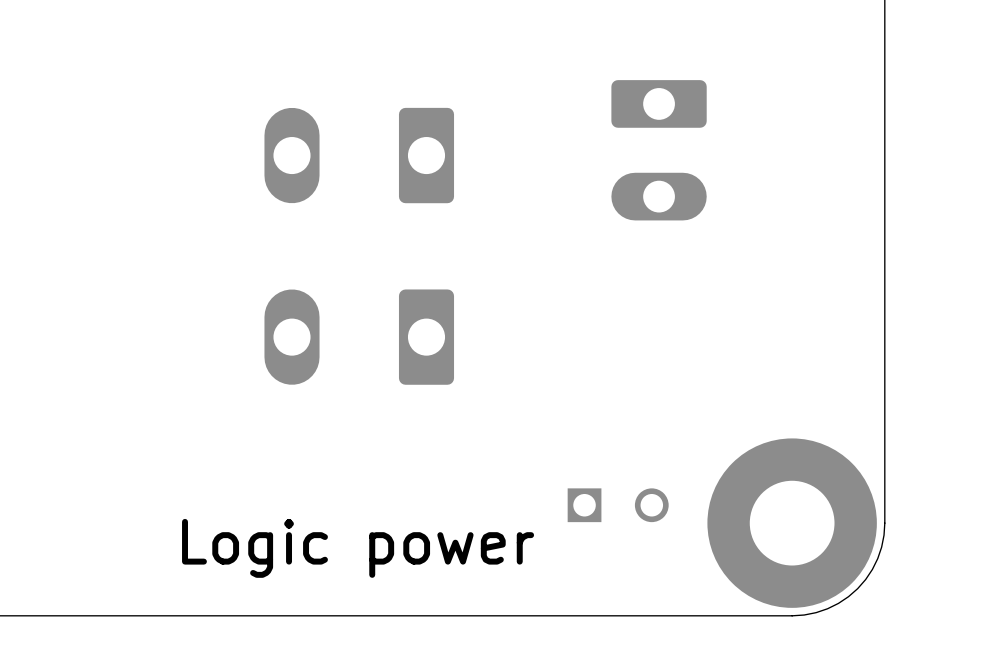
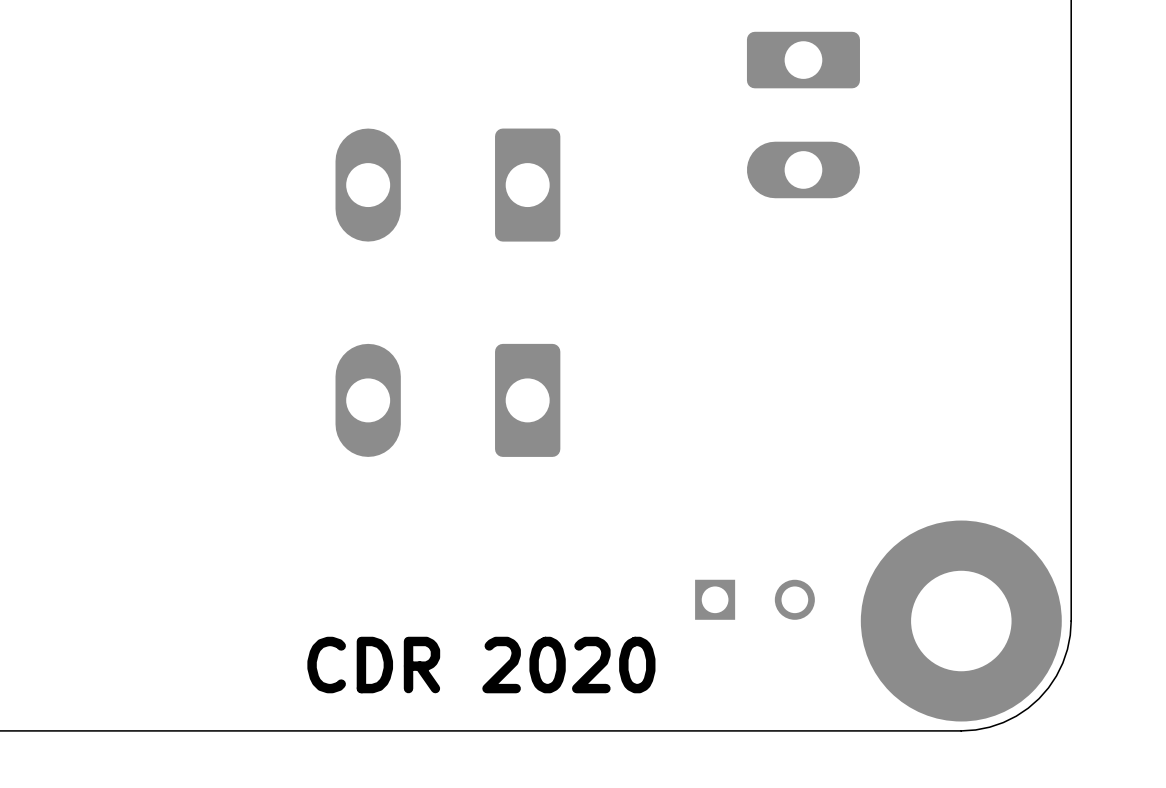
part position: (659, 150) -> (803, 115)
text: Logic power (358, 548) -> none
text: none -> CDR 2020 (481, 665)

